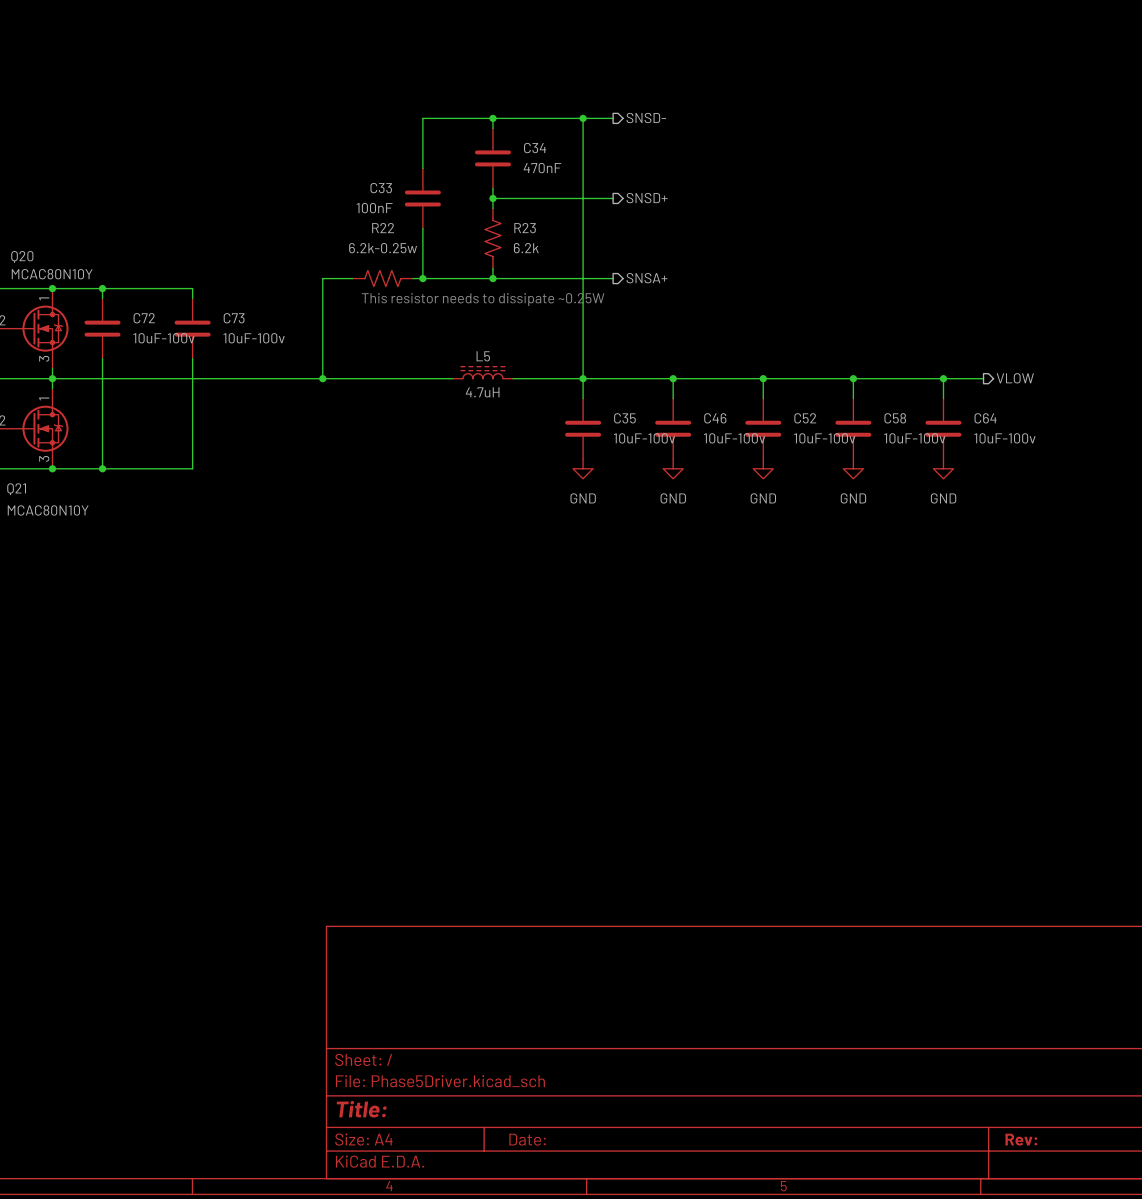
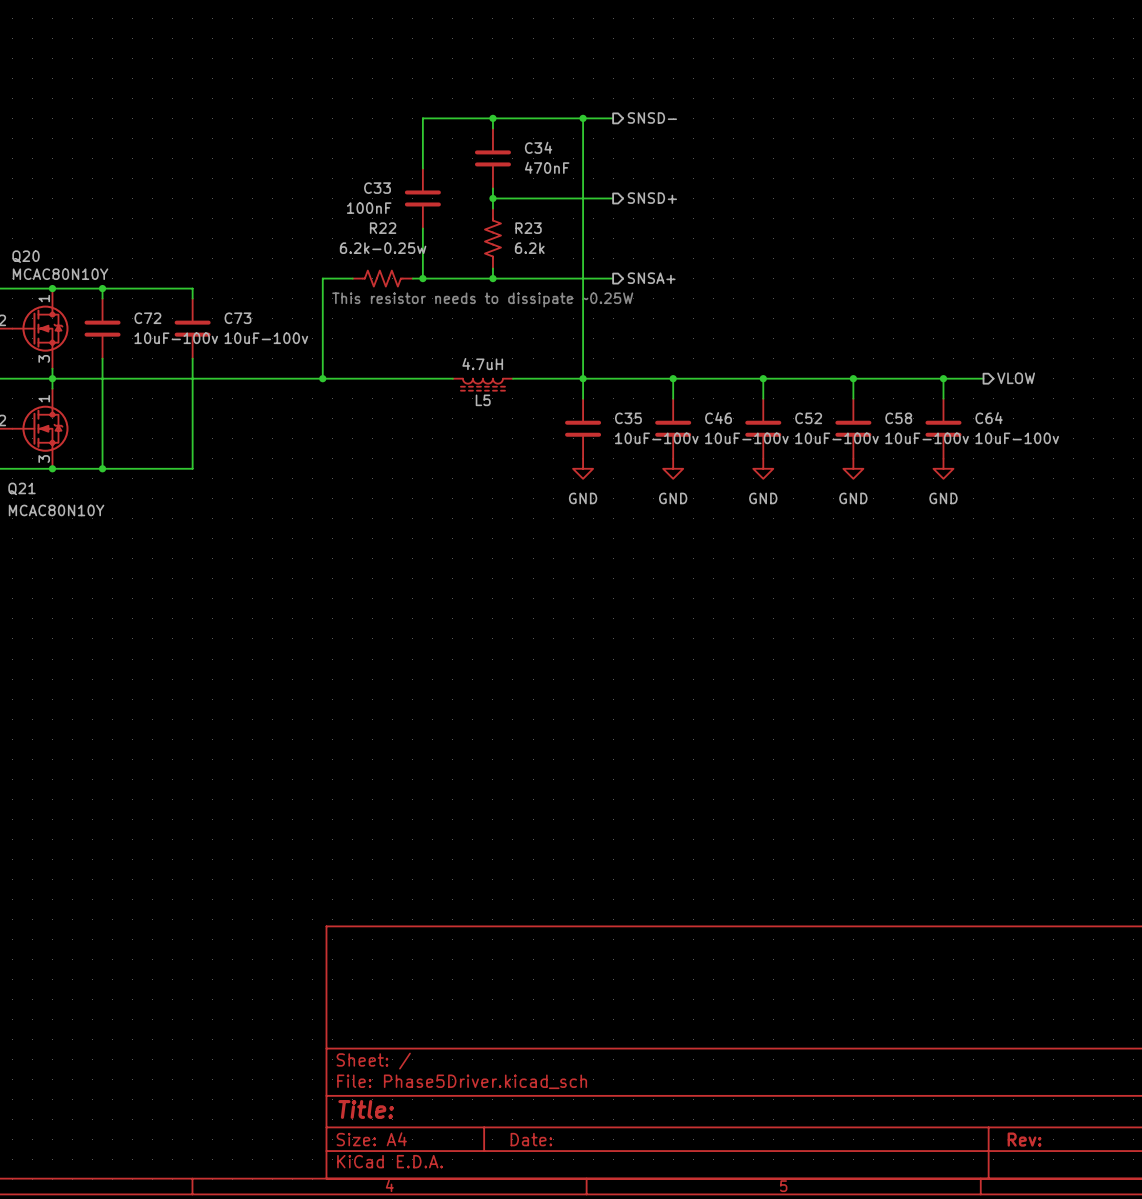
L5 rotation: 0° (482, 372) -> 180° (482, 384)

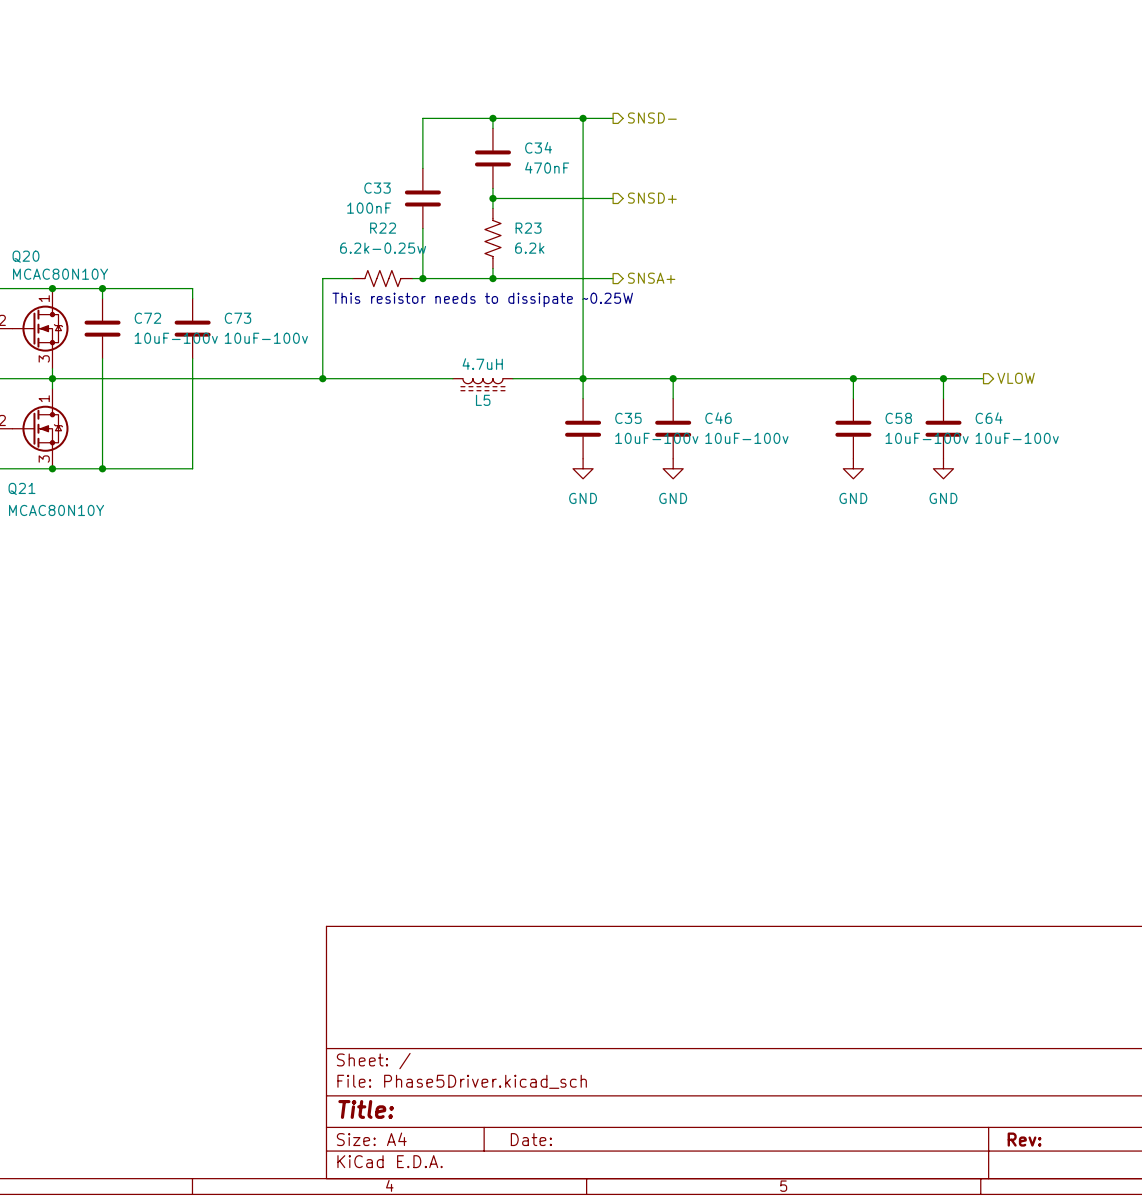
wire: (763, 378) (763, 398) -> none
junction: (763, 378) -> none
C52: 10uF-100v (763, 428) -> none
power symbol: GND (763, 468) -> none

